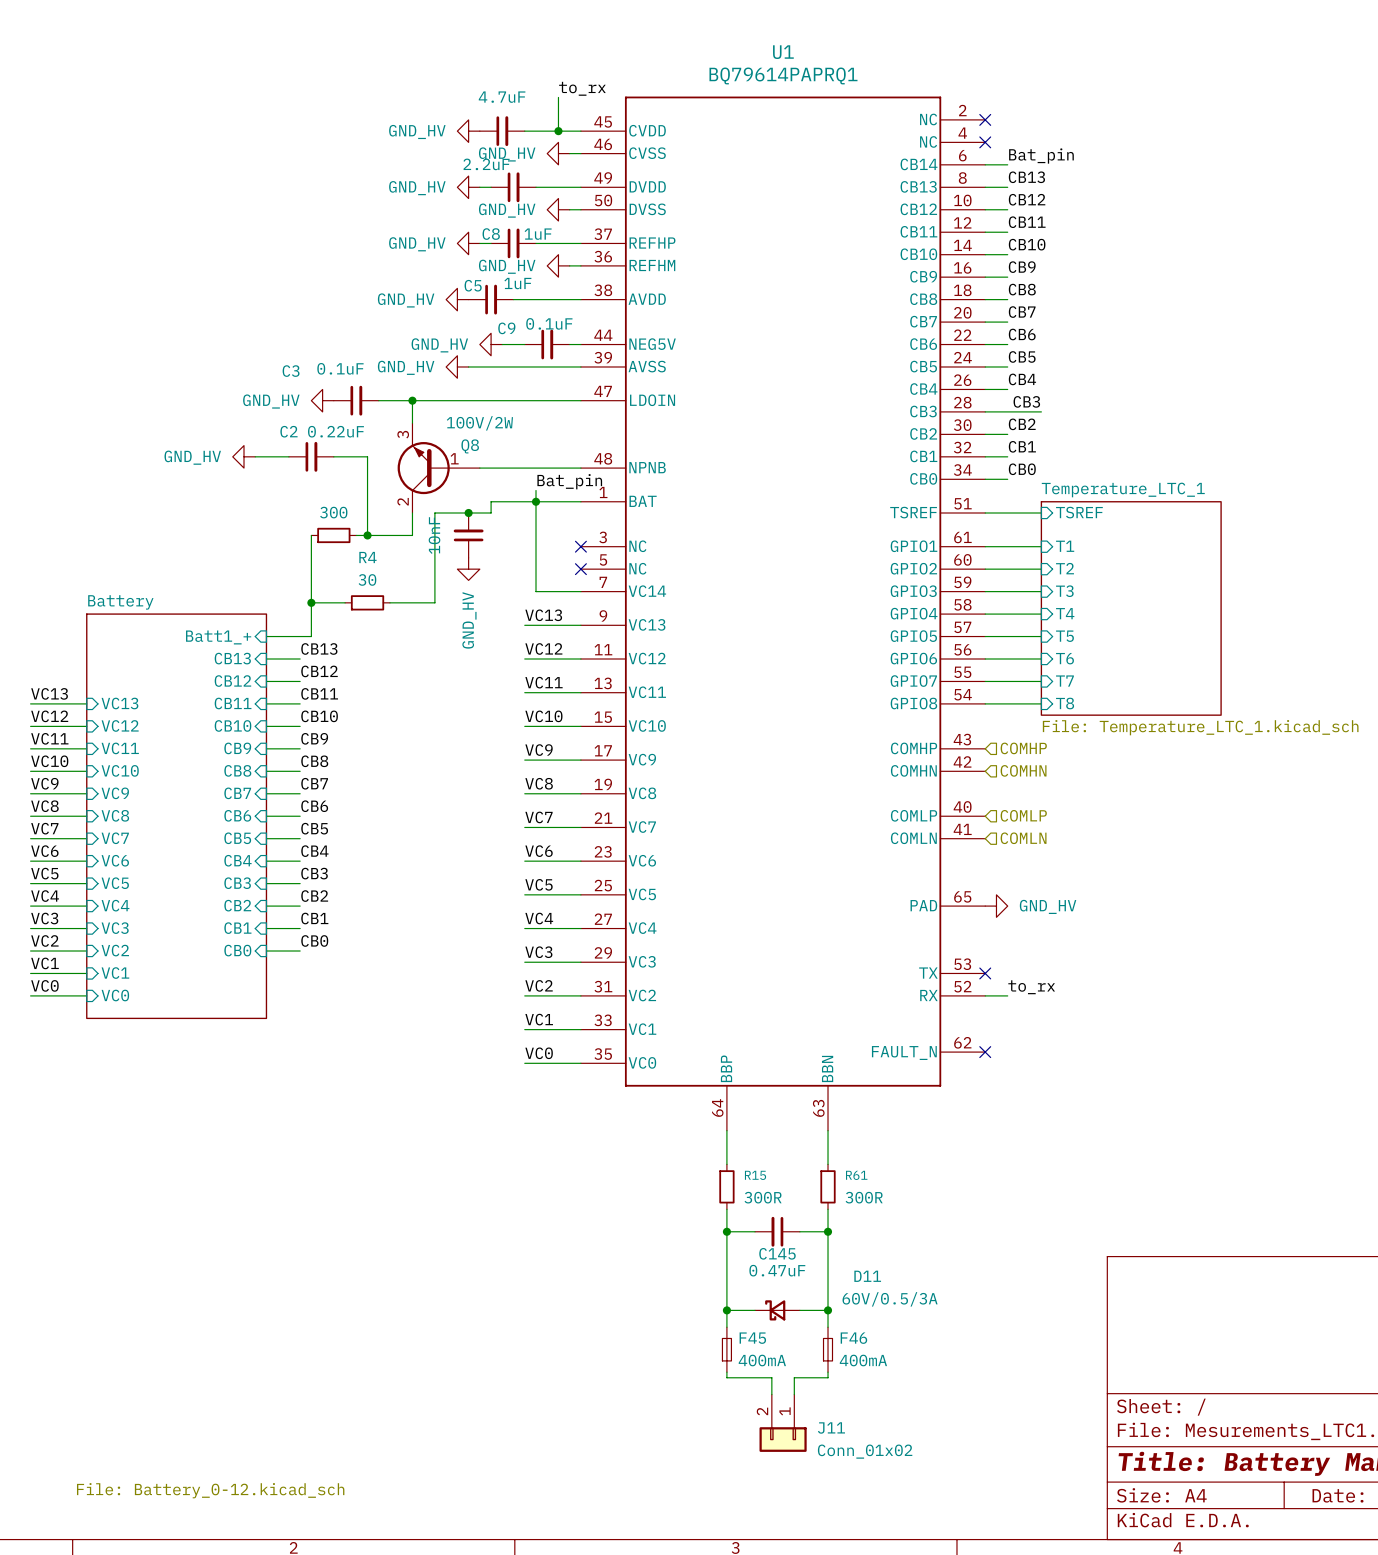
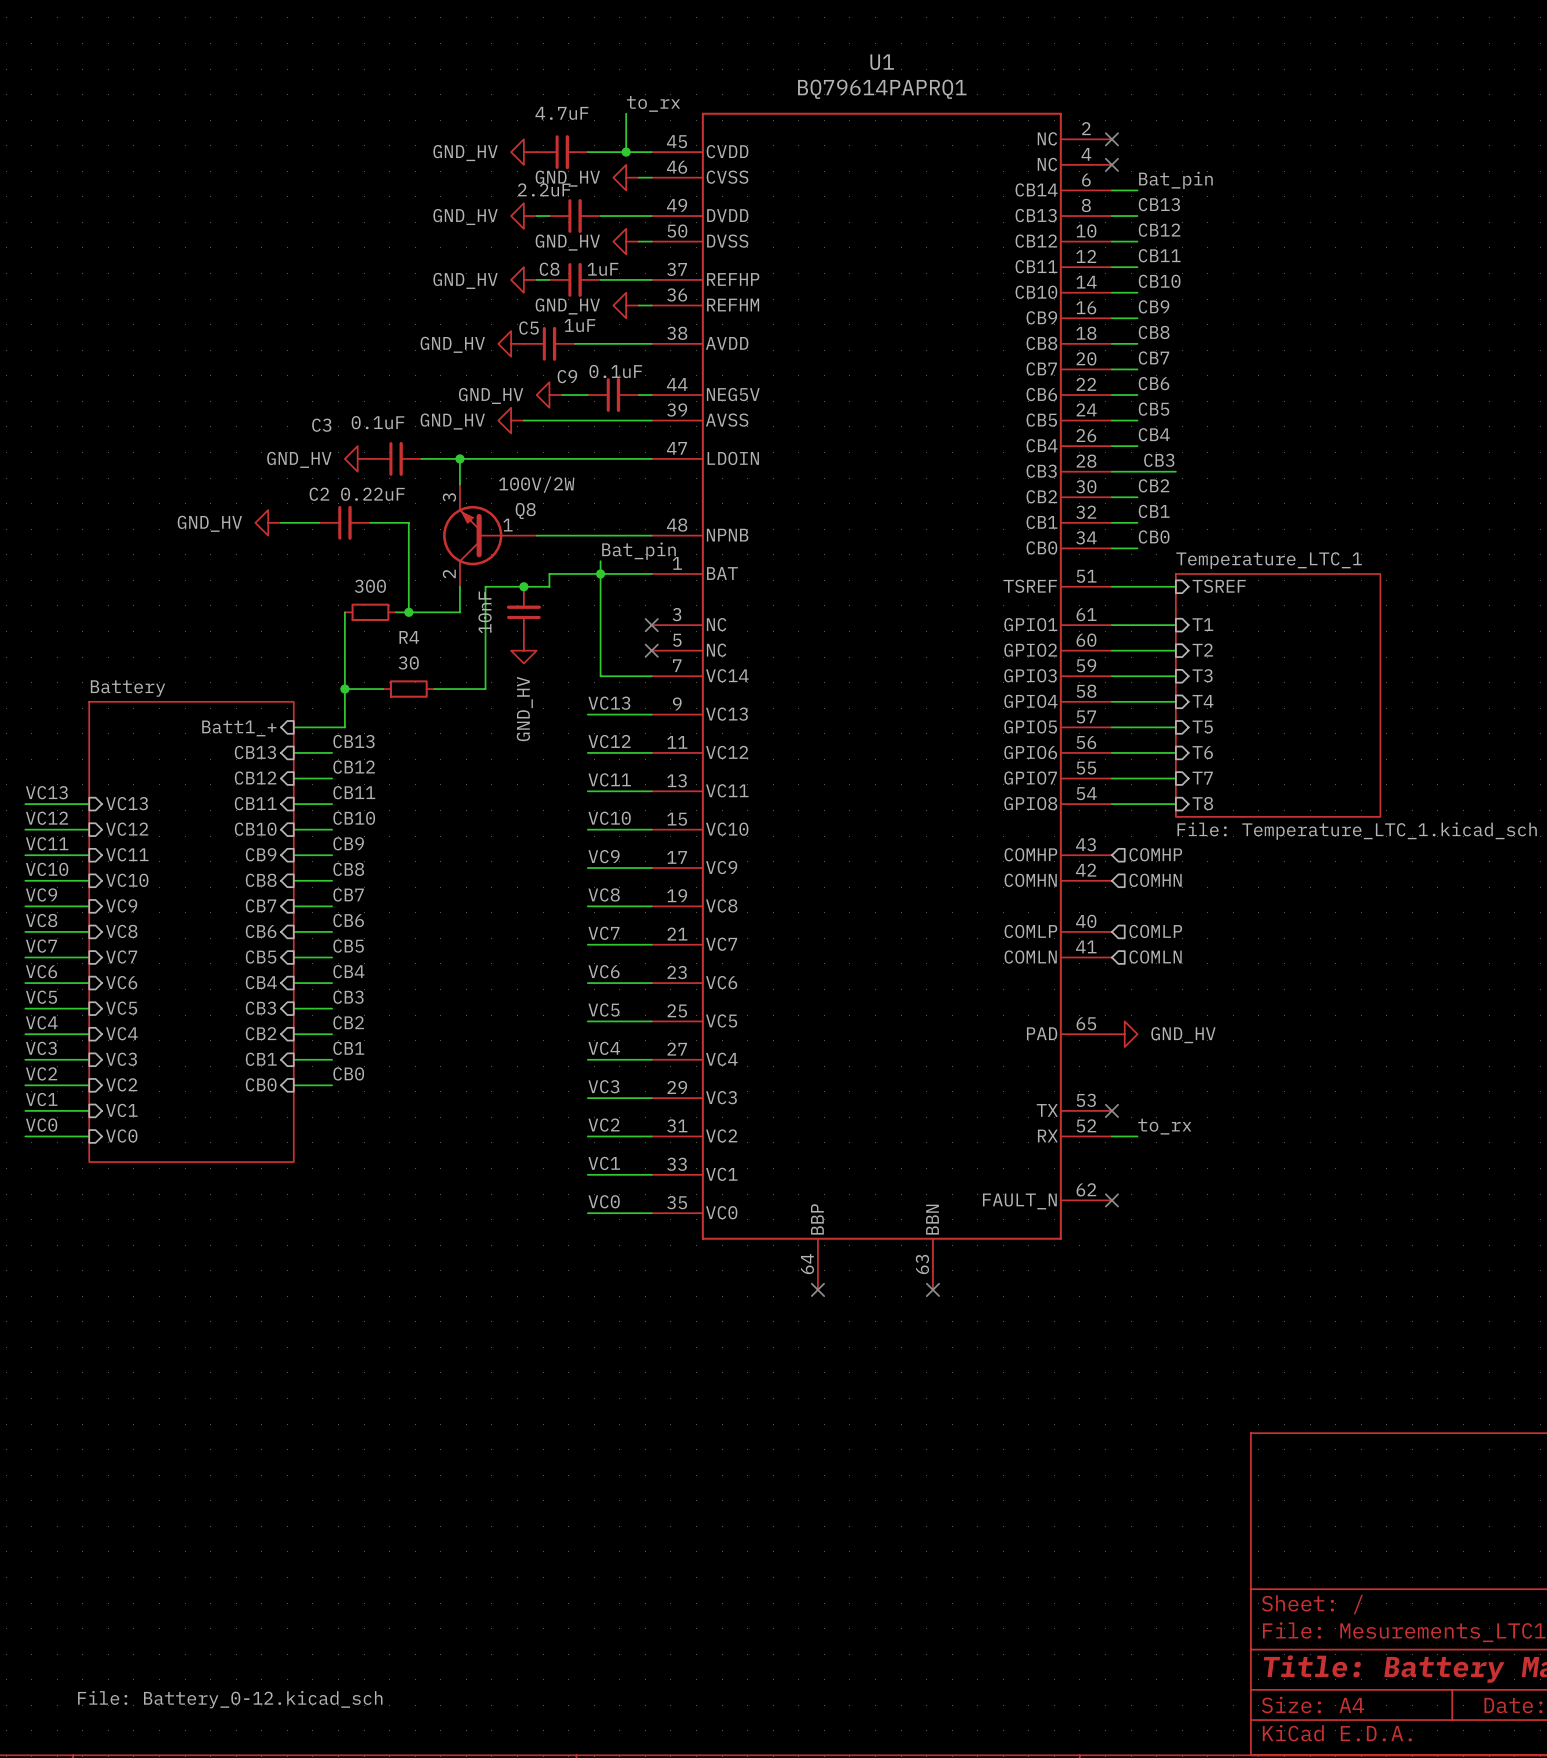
wire: (726, 1130) (726, 1164) -> none
no-connect mark: none -> (817, 1289)
wire: (828, 1130) (828, 1164) -> none
no-connect mark: none -> (932, 1289)
R15: 300R (726, 1186) -> none
R61: 300R (828, 1186) -> none
wire: (726, 1209) (726, 1327) -> none
wire: (828, 1209) (828, 1327) -> none
wire: (726, 1231) (755, 1231) -> none
junction: (726, 1231) -> none
C145: 0.47uF (777, 1231) -> none
wire: (799, 1231) (828, 1231) -> none
junction: (828, 1231) -> none
wire: (726, 1310) (755, 1310) -> none
junction: (726, 1310) -> none
D11: 60V/0.5/3A (777, 1310) -> none
wire: (799, 1310) (828, 1310) -> none
junction: (828, 1310) -> none
F45: 400mA (726, 1349) -> none
F46: 400mA (828, 1349) -> none
wire: (726, 1372) (726, 1377) (771, 1377) (771, 1394) -> none
wire: (828, 1372) (828, 1377) (794, 1377) (794, 1394) -> none
J11: Conn_01x02 (783, 1423) -> none

